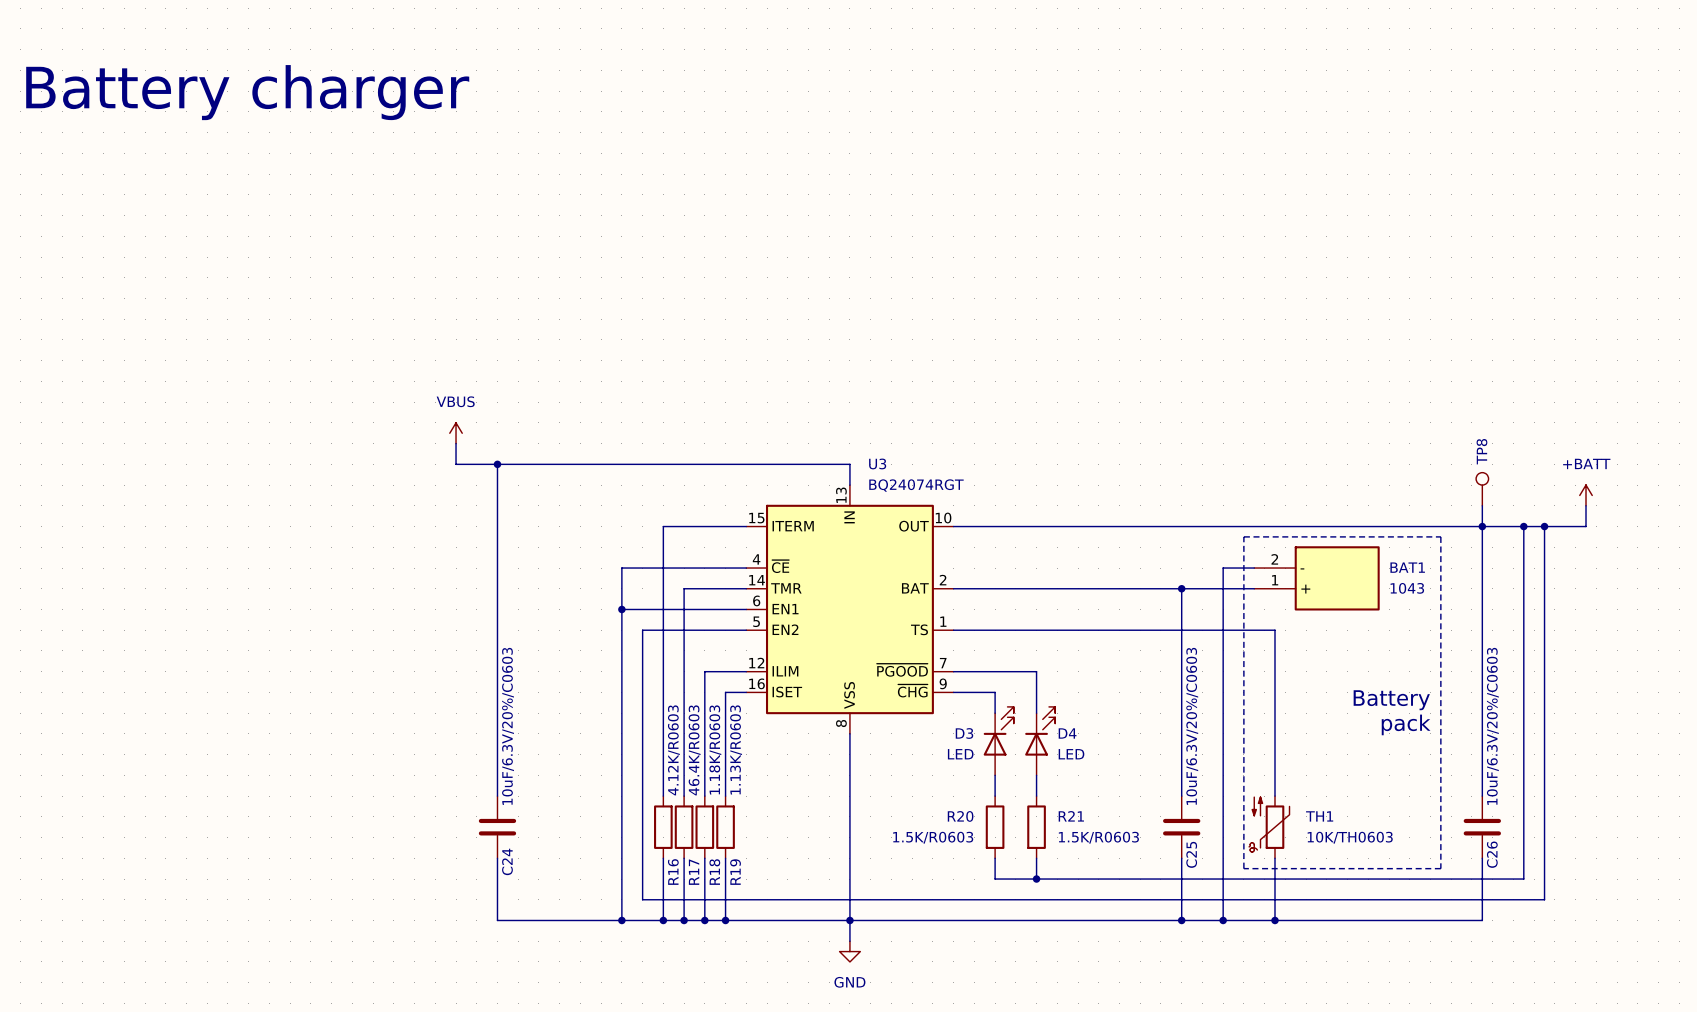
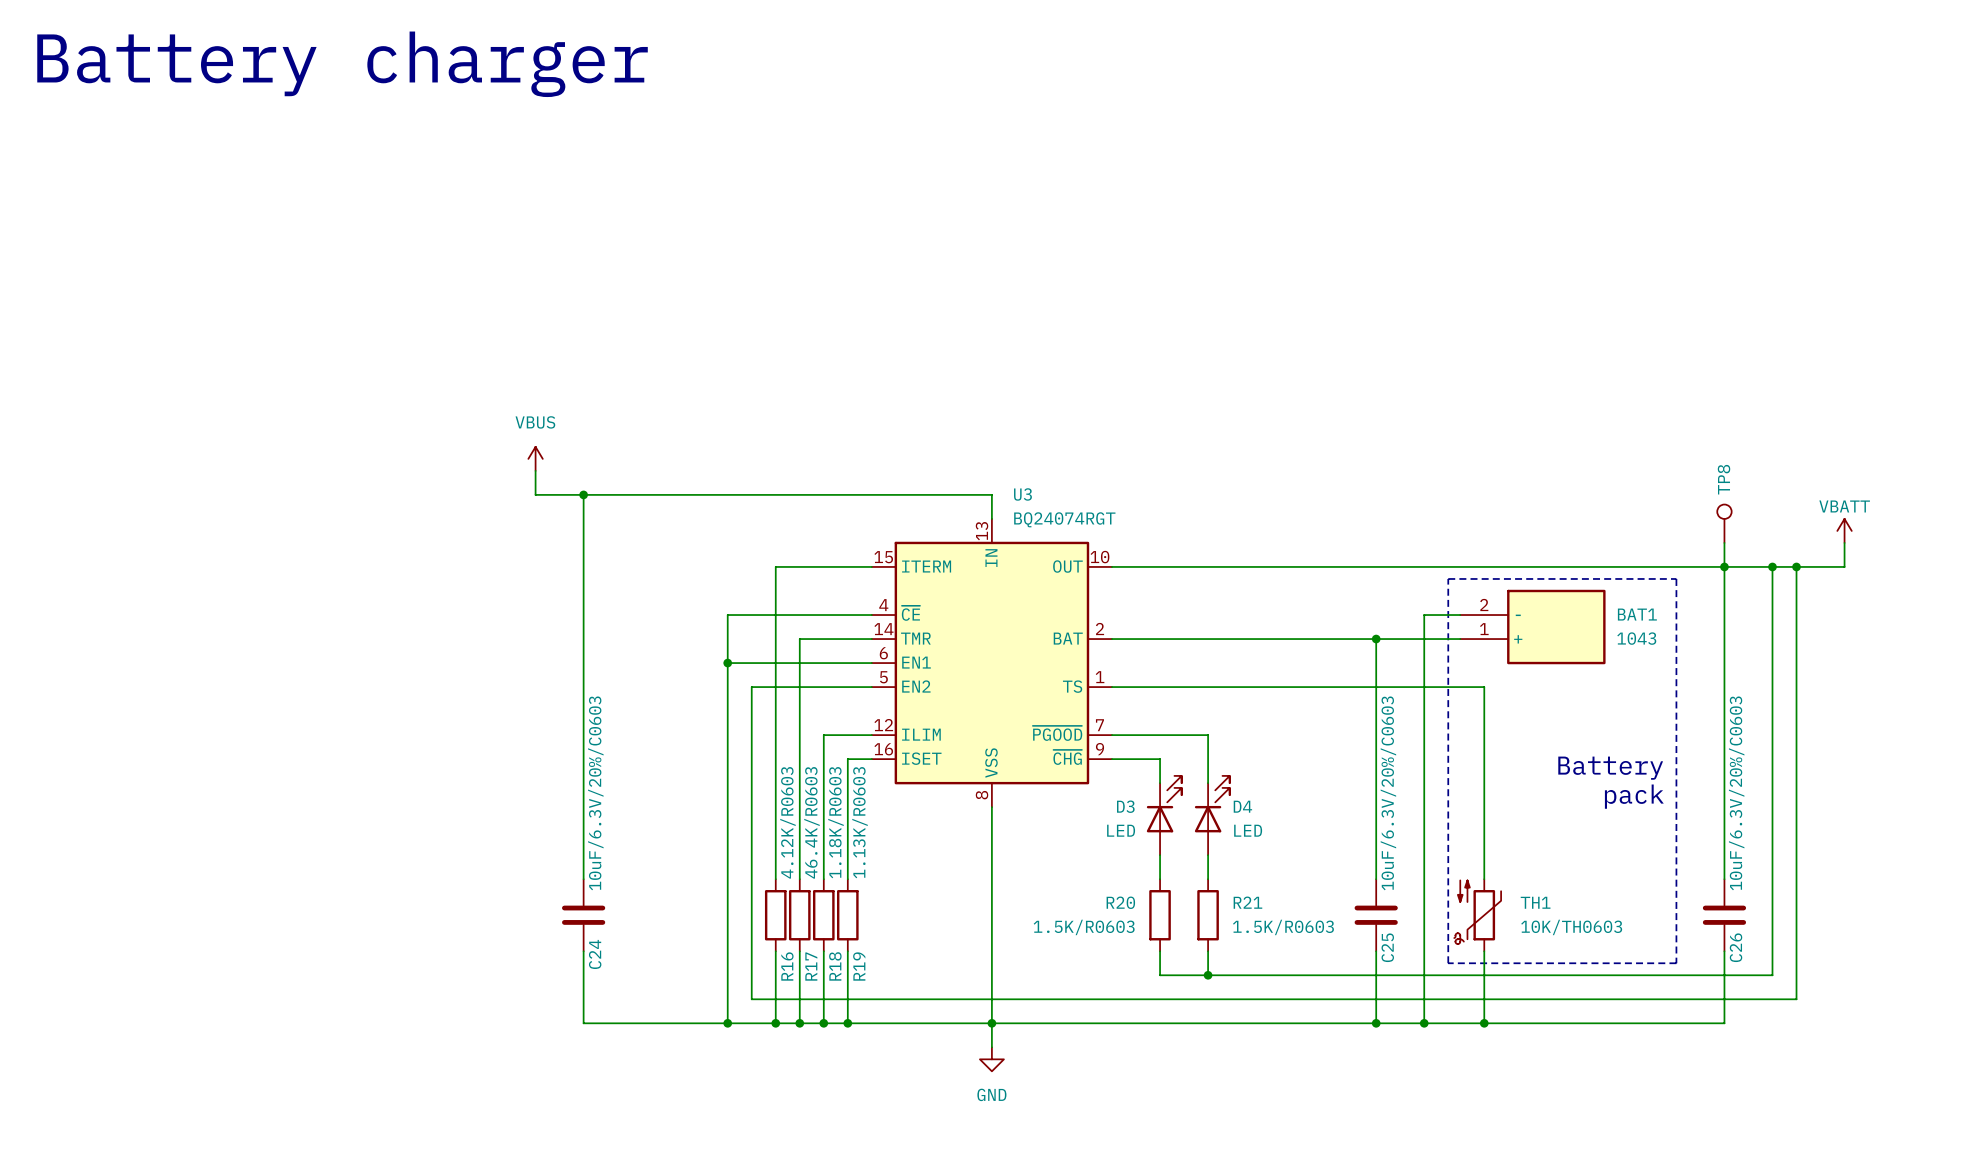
power symbol: +BATT (1586, 495) -> VBATT (1844, 530)

